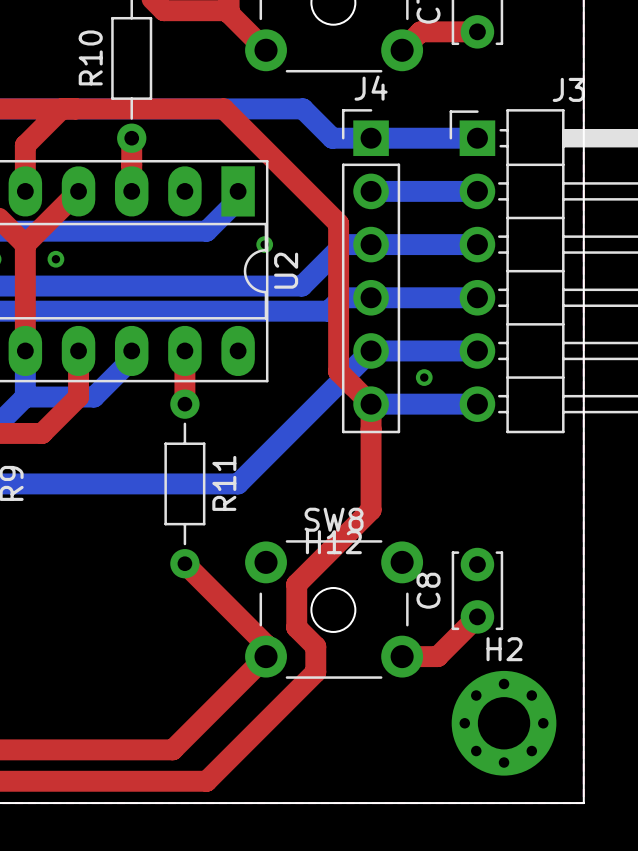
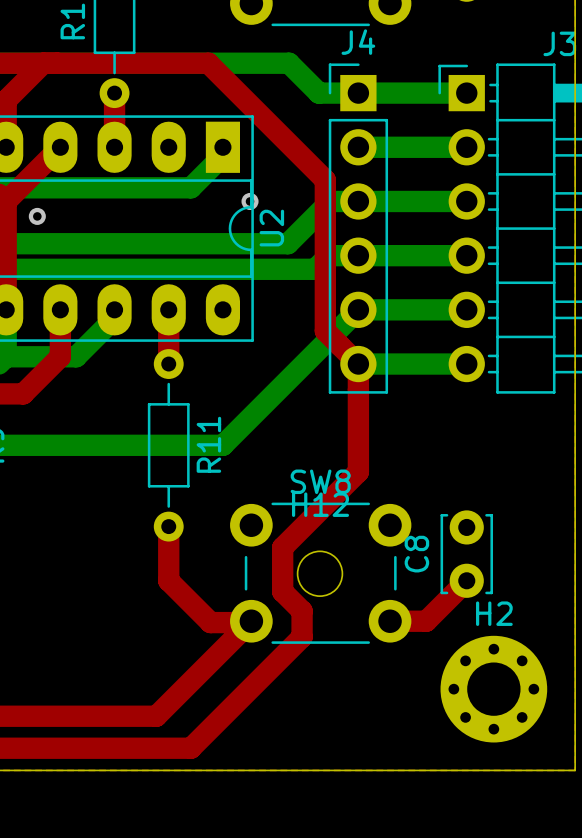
via: (424, 377) -> none
top track: (184, 563) (266, 644) (264, 657) -> (168, 526) (168, 580) (210, 622) (250, 622)

